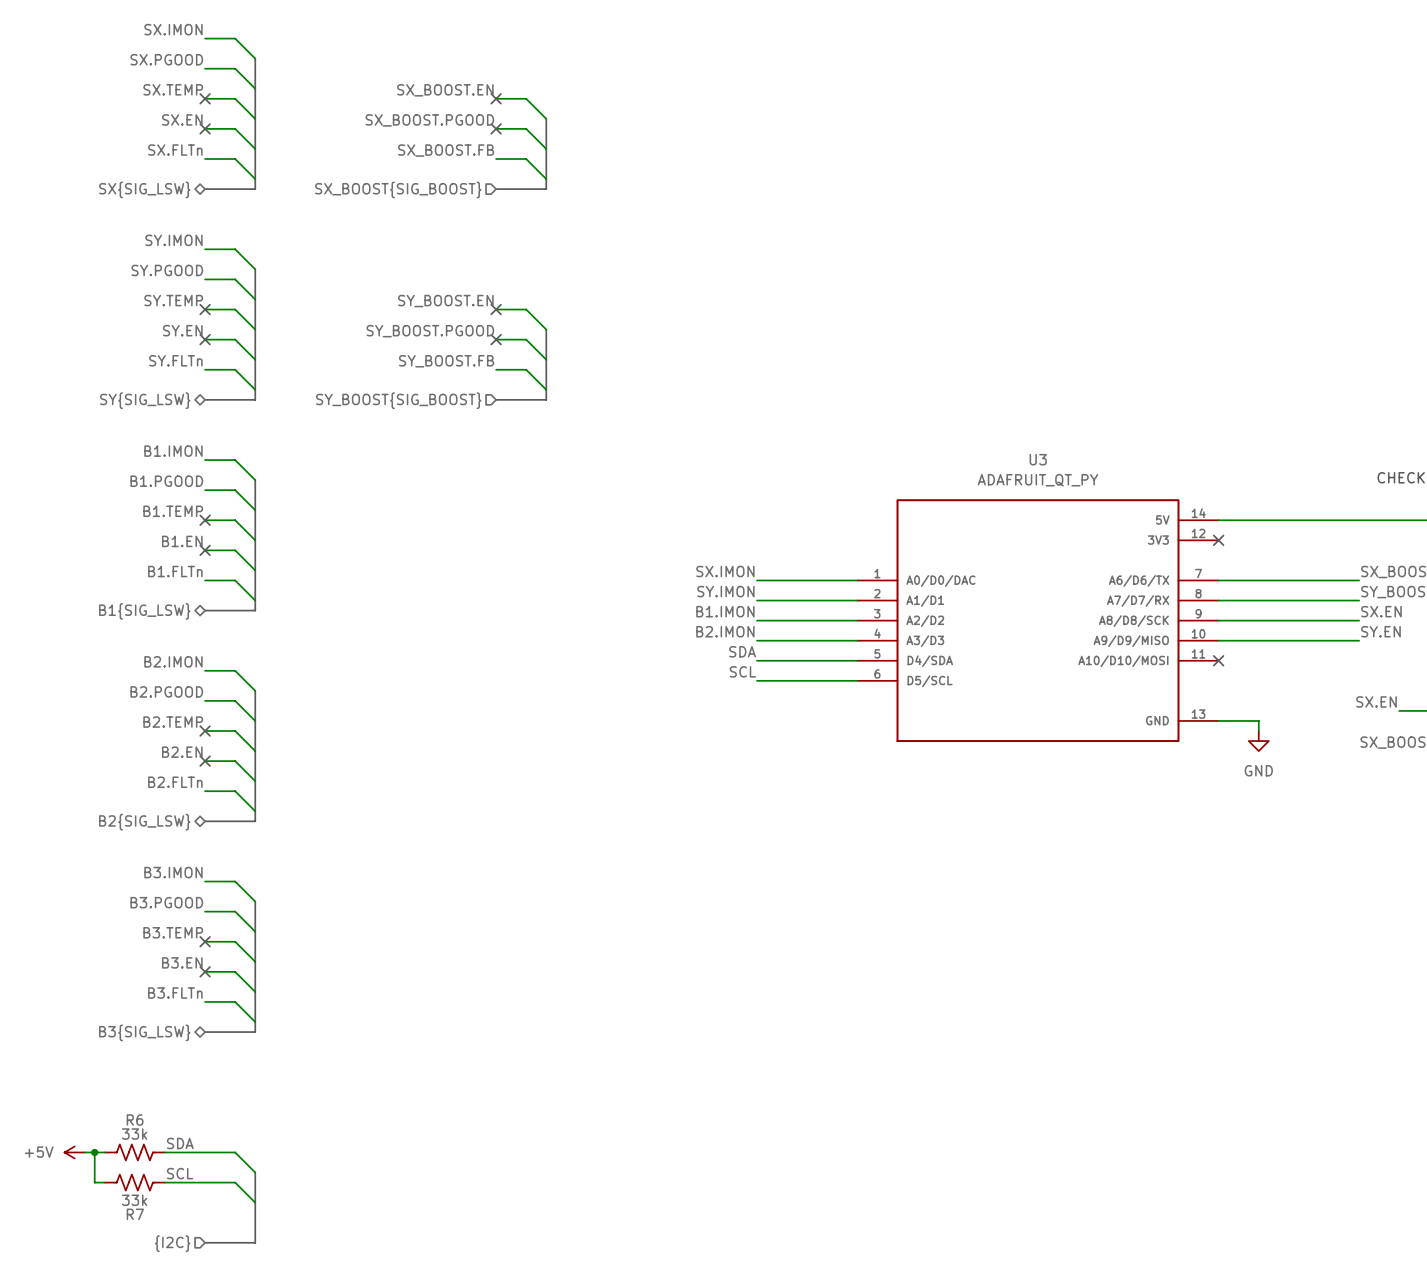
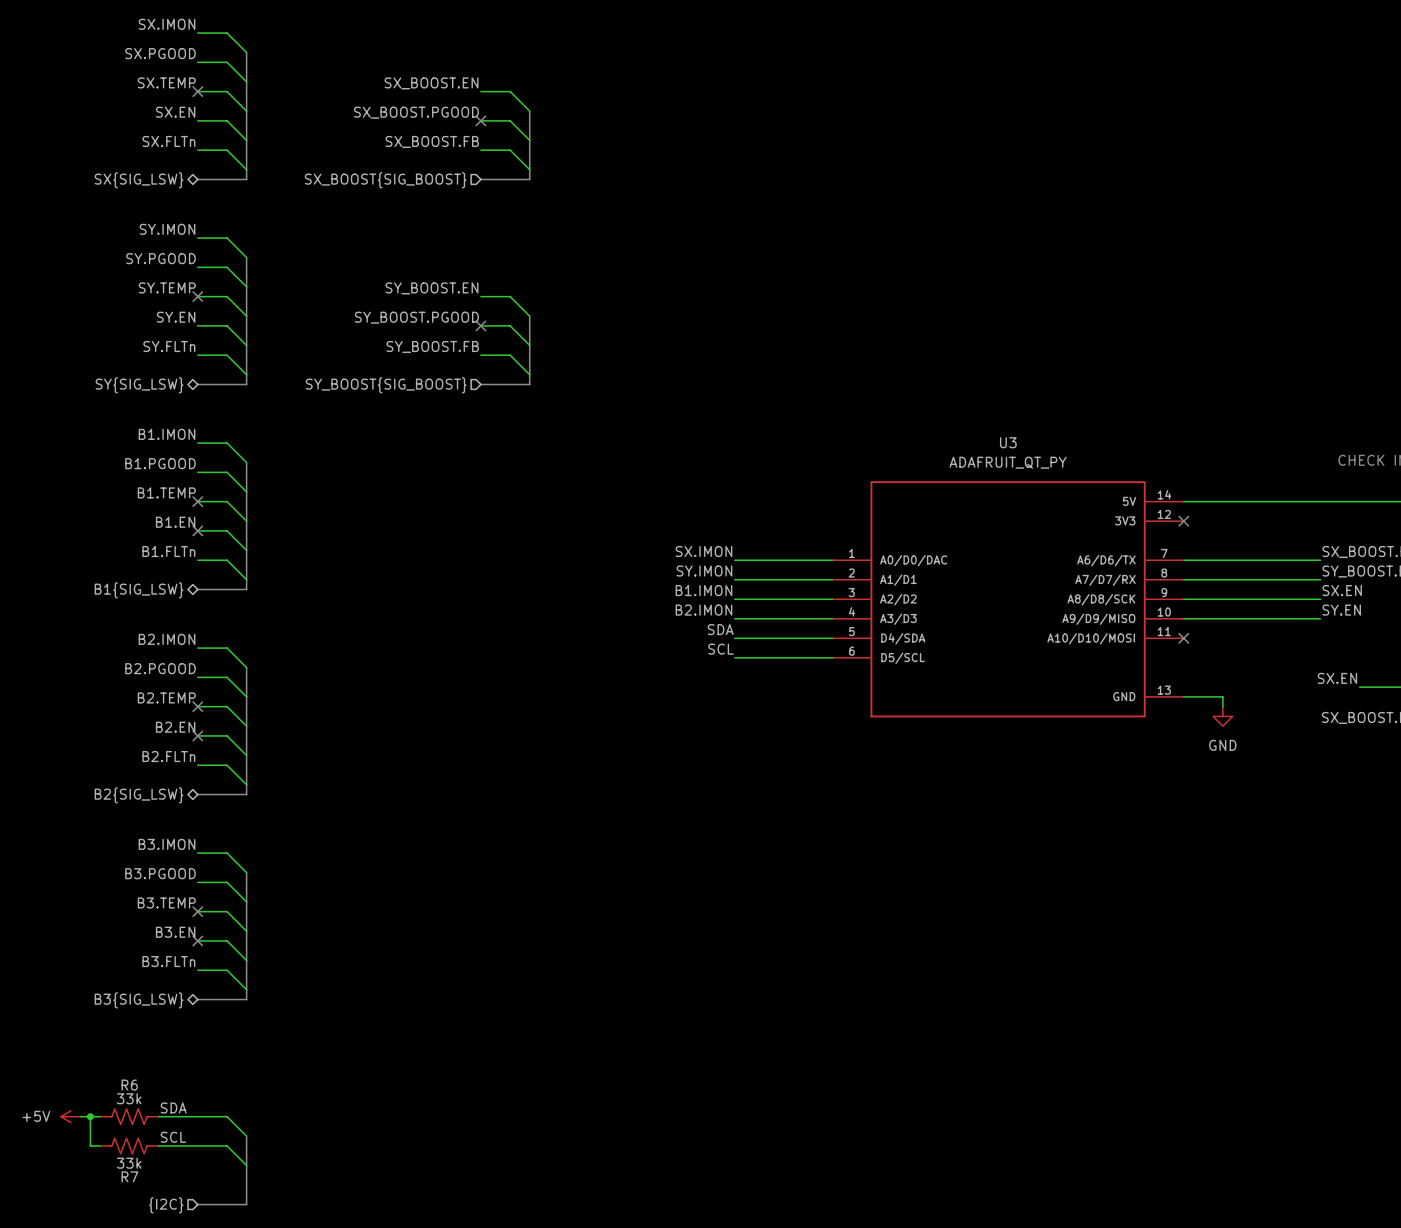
no-connect mark: (496, 98) -> none
no-connect mark: (205, 128) -> none
no-connect mark: (496, 309) -> none
no-connect mark: (205, 339) -> none

